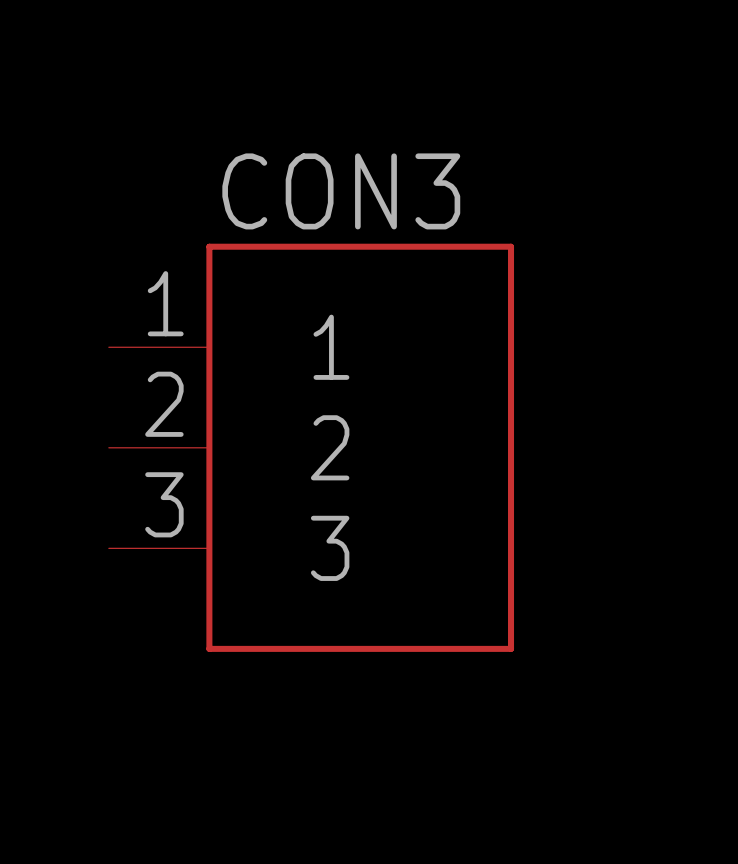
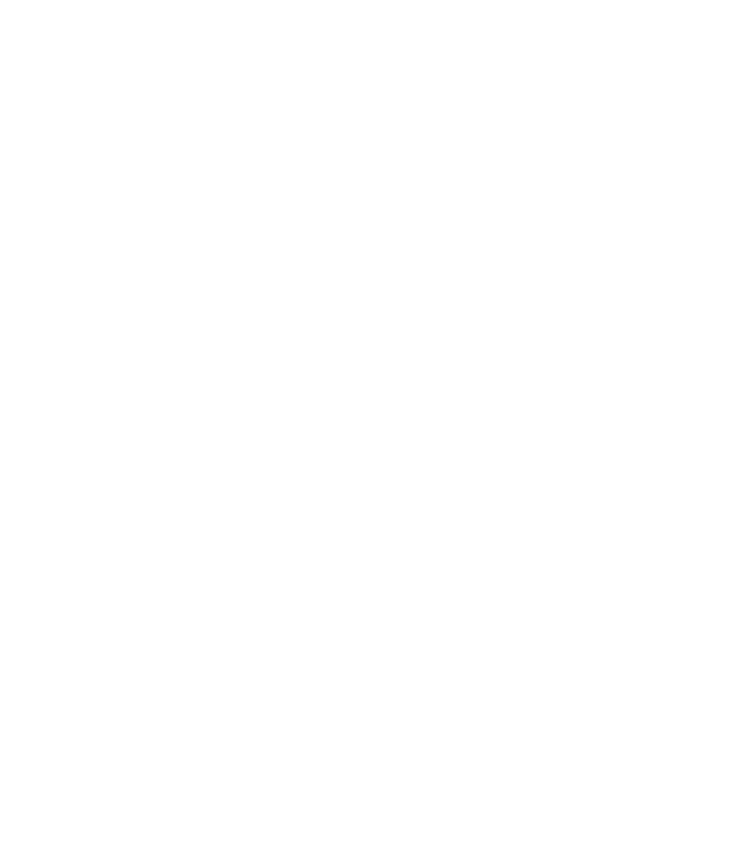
CON3: (311, 447) -> none

